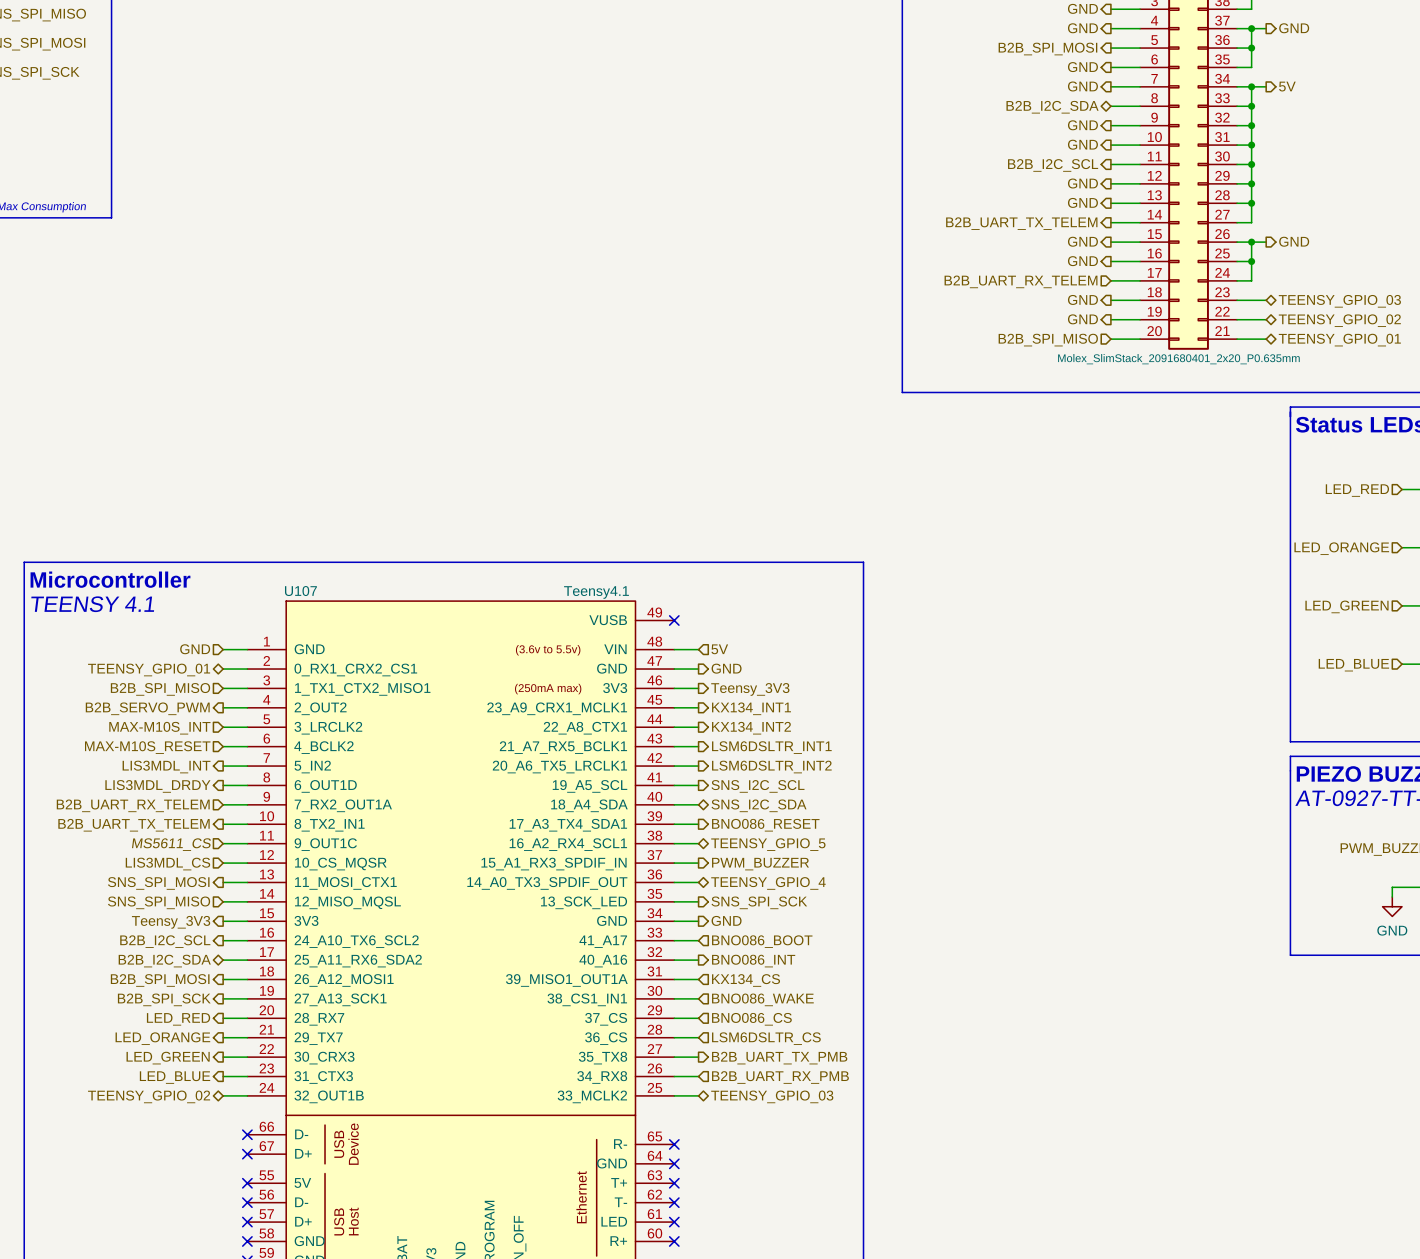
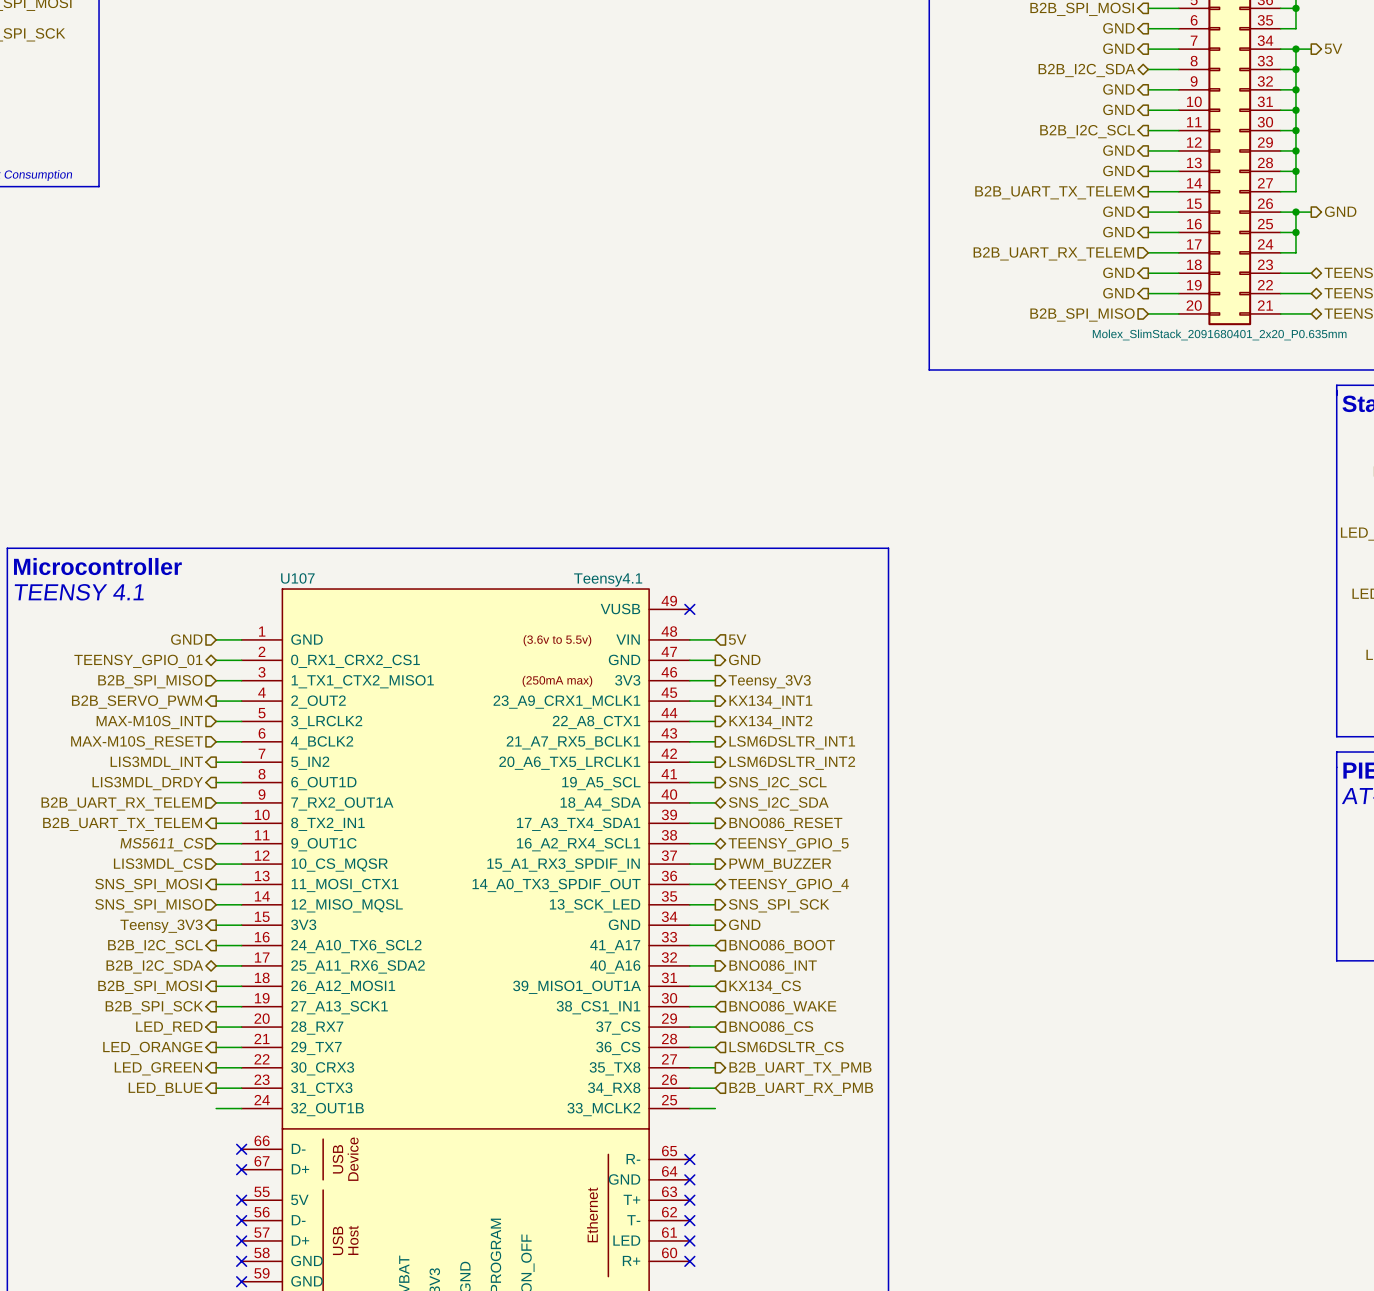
hierarchical label: TEENSY_GPIO_02 (149, 1096) -> none
hierarchical label: TEENSY_GPIO_03 (772, 1096) -> none

